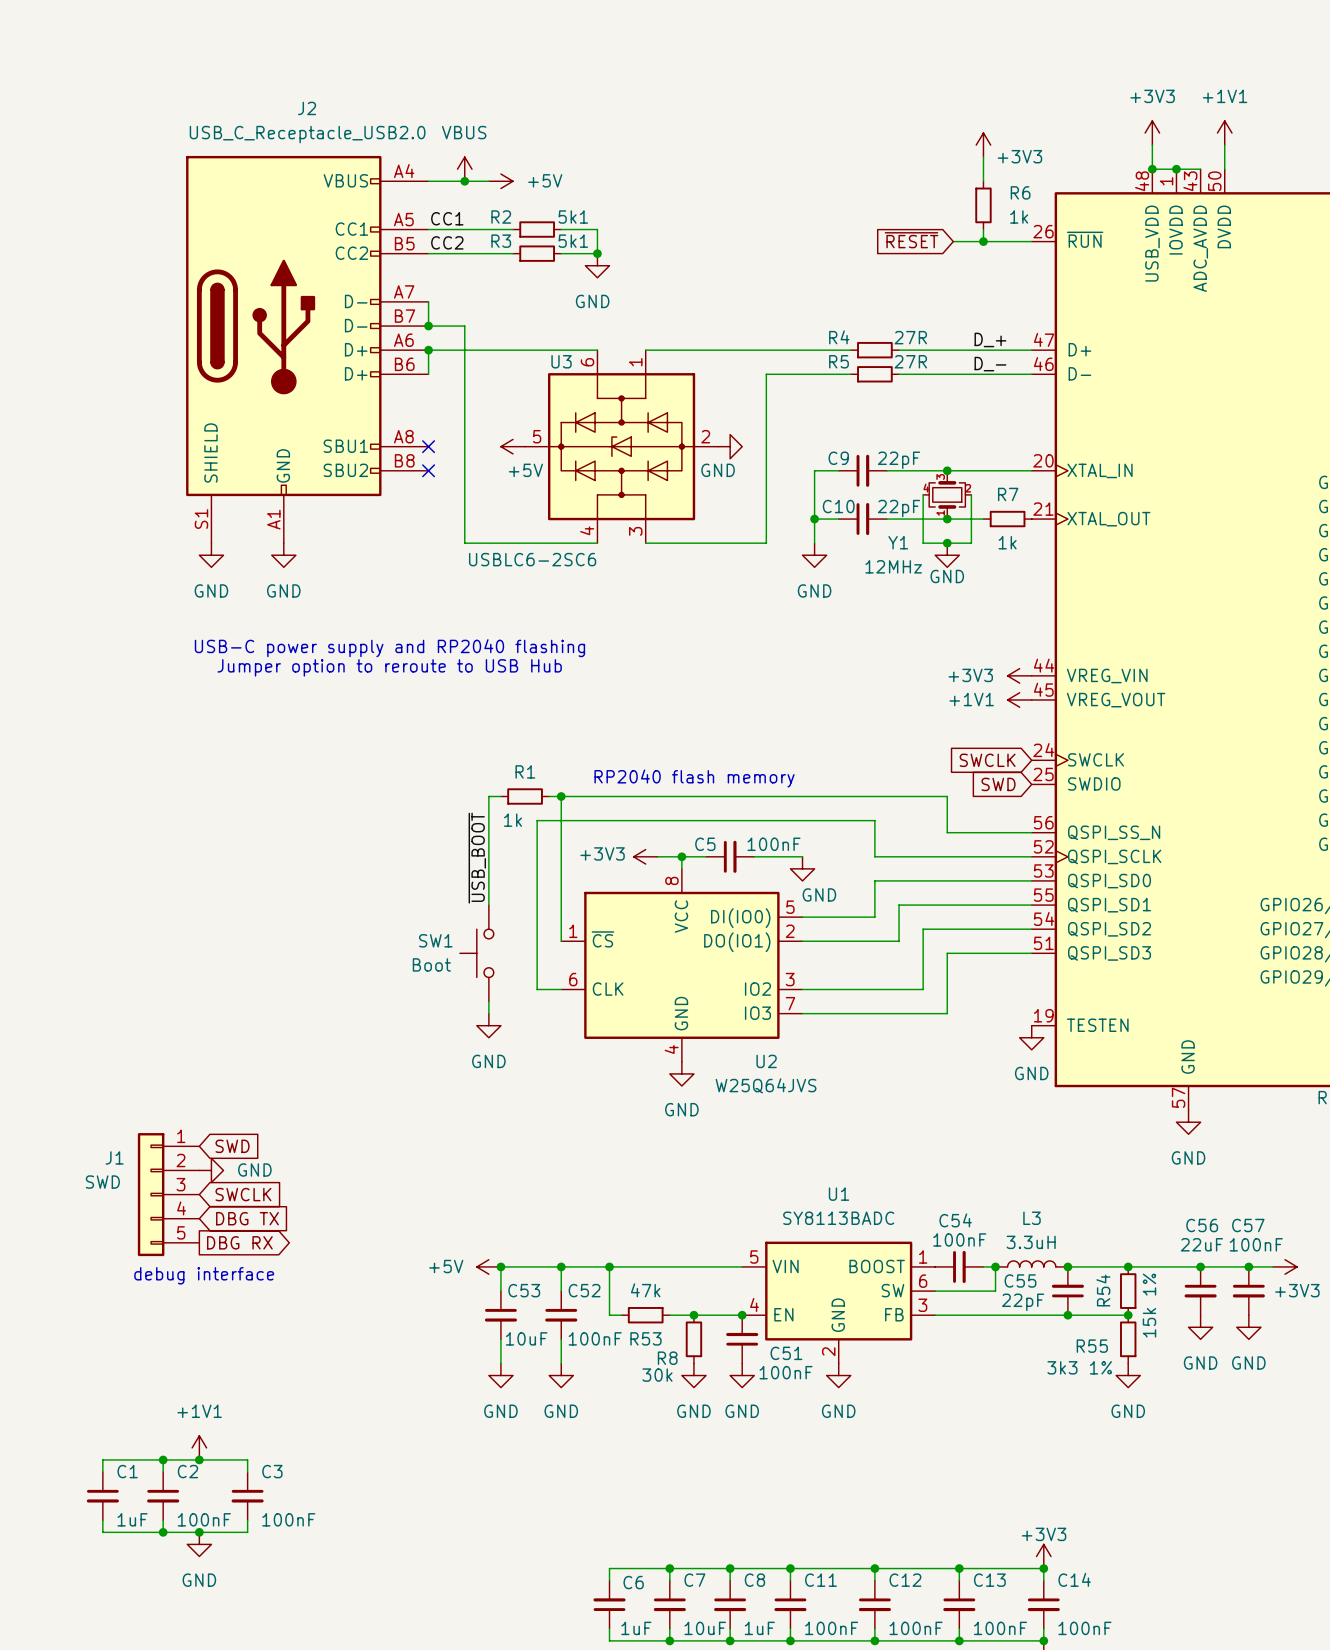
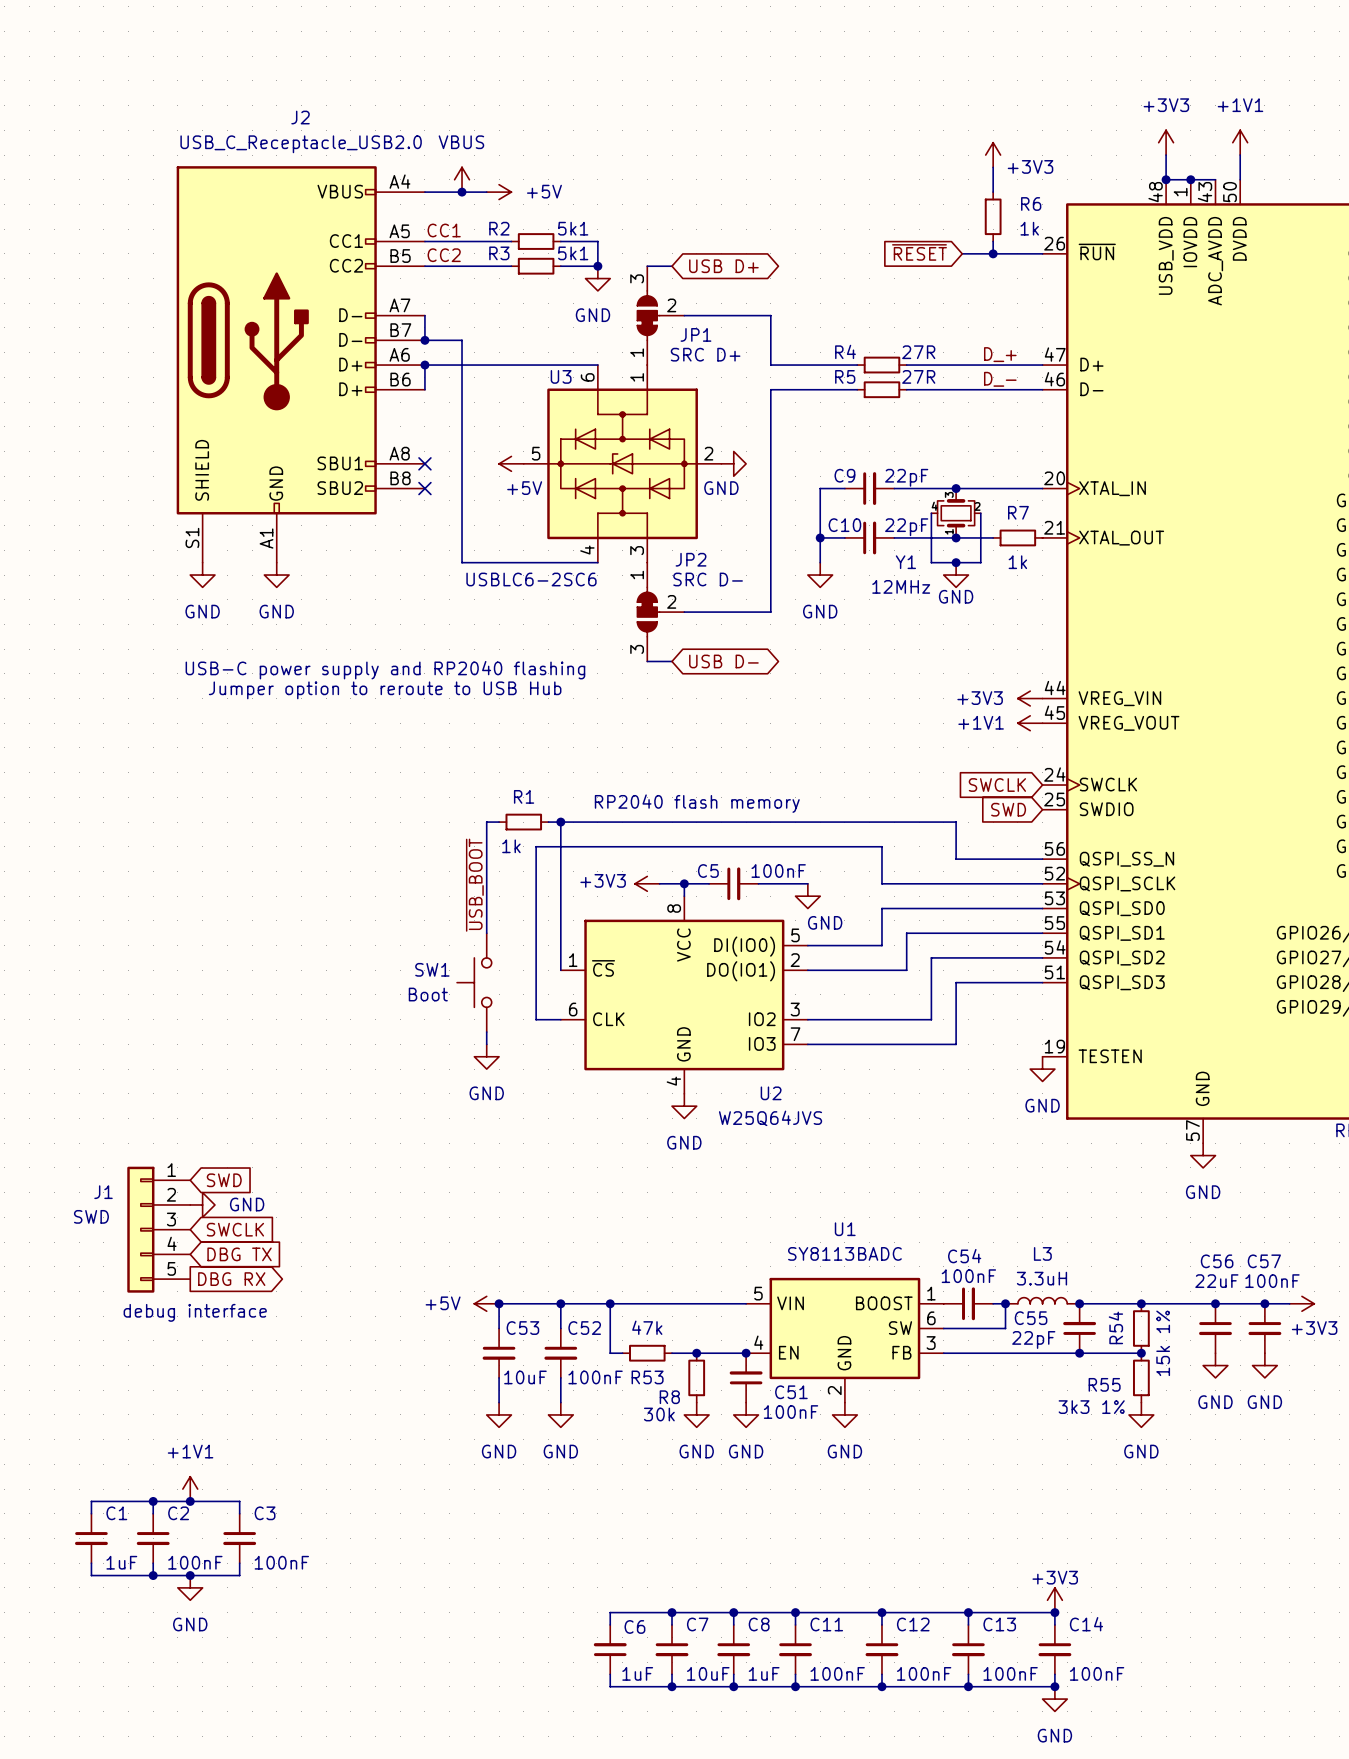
wire: none -> (647, 266) (672, 266)
global label: none -> USB D+ (723, 266)
JP1: none -> SRC D+ (660, 315)
wire: (645, 350) (766, 350) -> (684, 315) (770, 315) (770, 365)
wire: (645, 543) (766, 543) -> (684, 612) (770, 612) (770, 562)
JP2: none -> SRC D- (660, 612)
wire: none -> (647, 661) (672, 661)
global label: none -> USB D- (723, 661)

